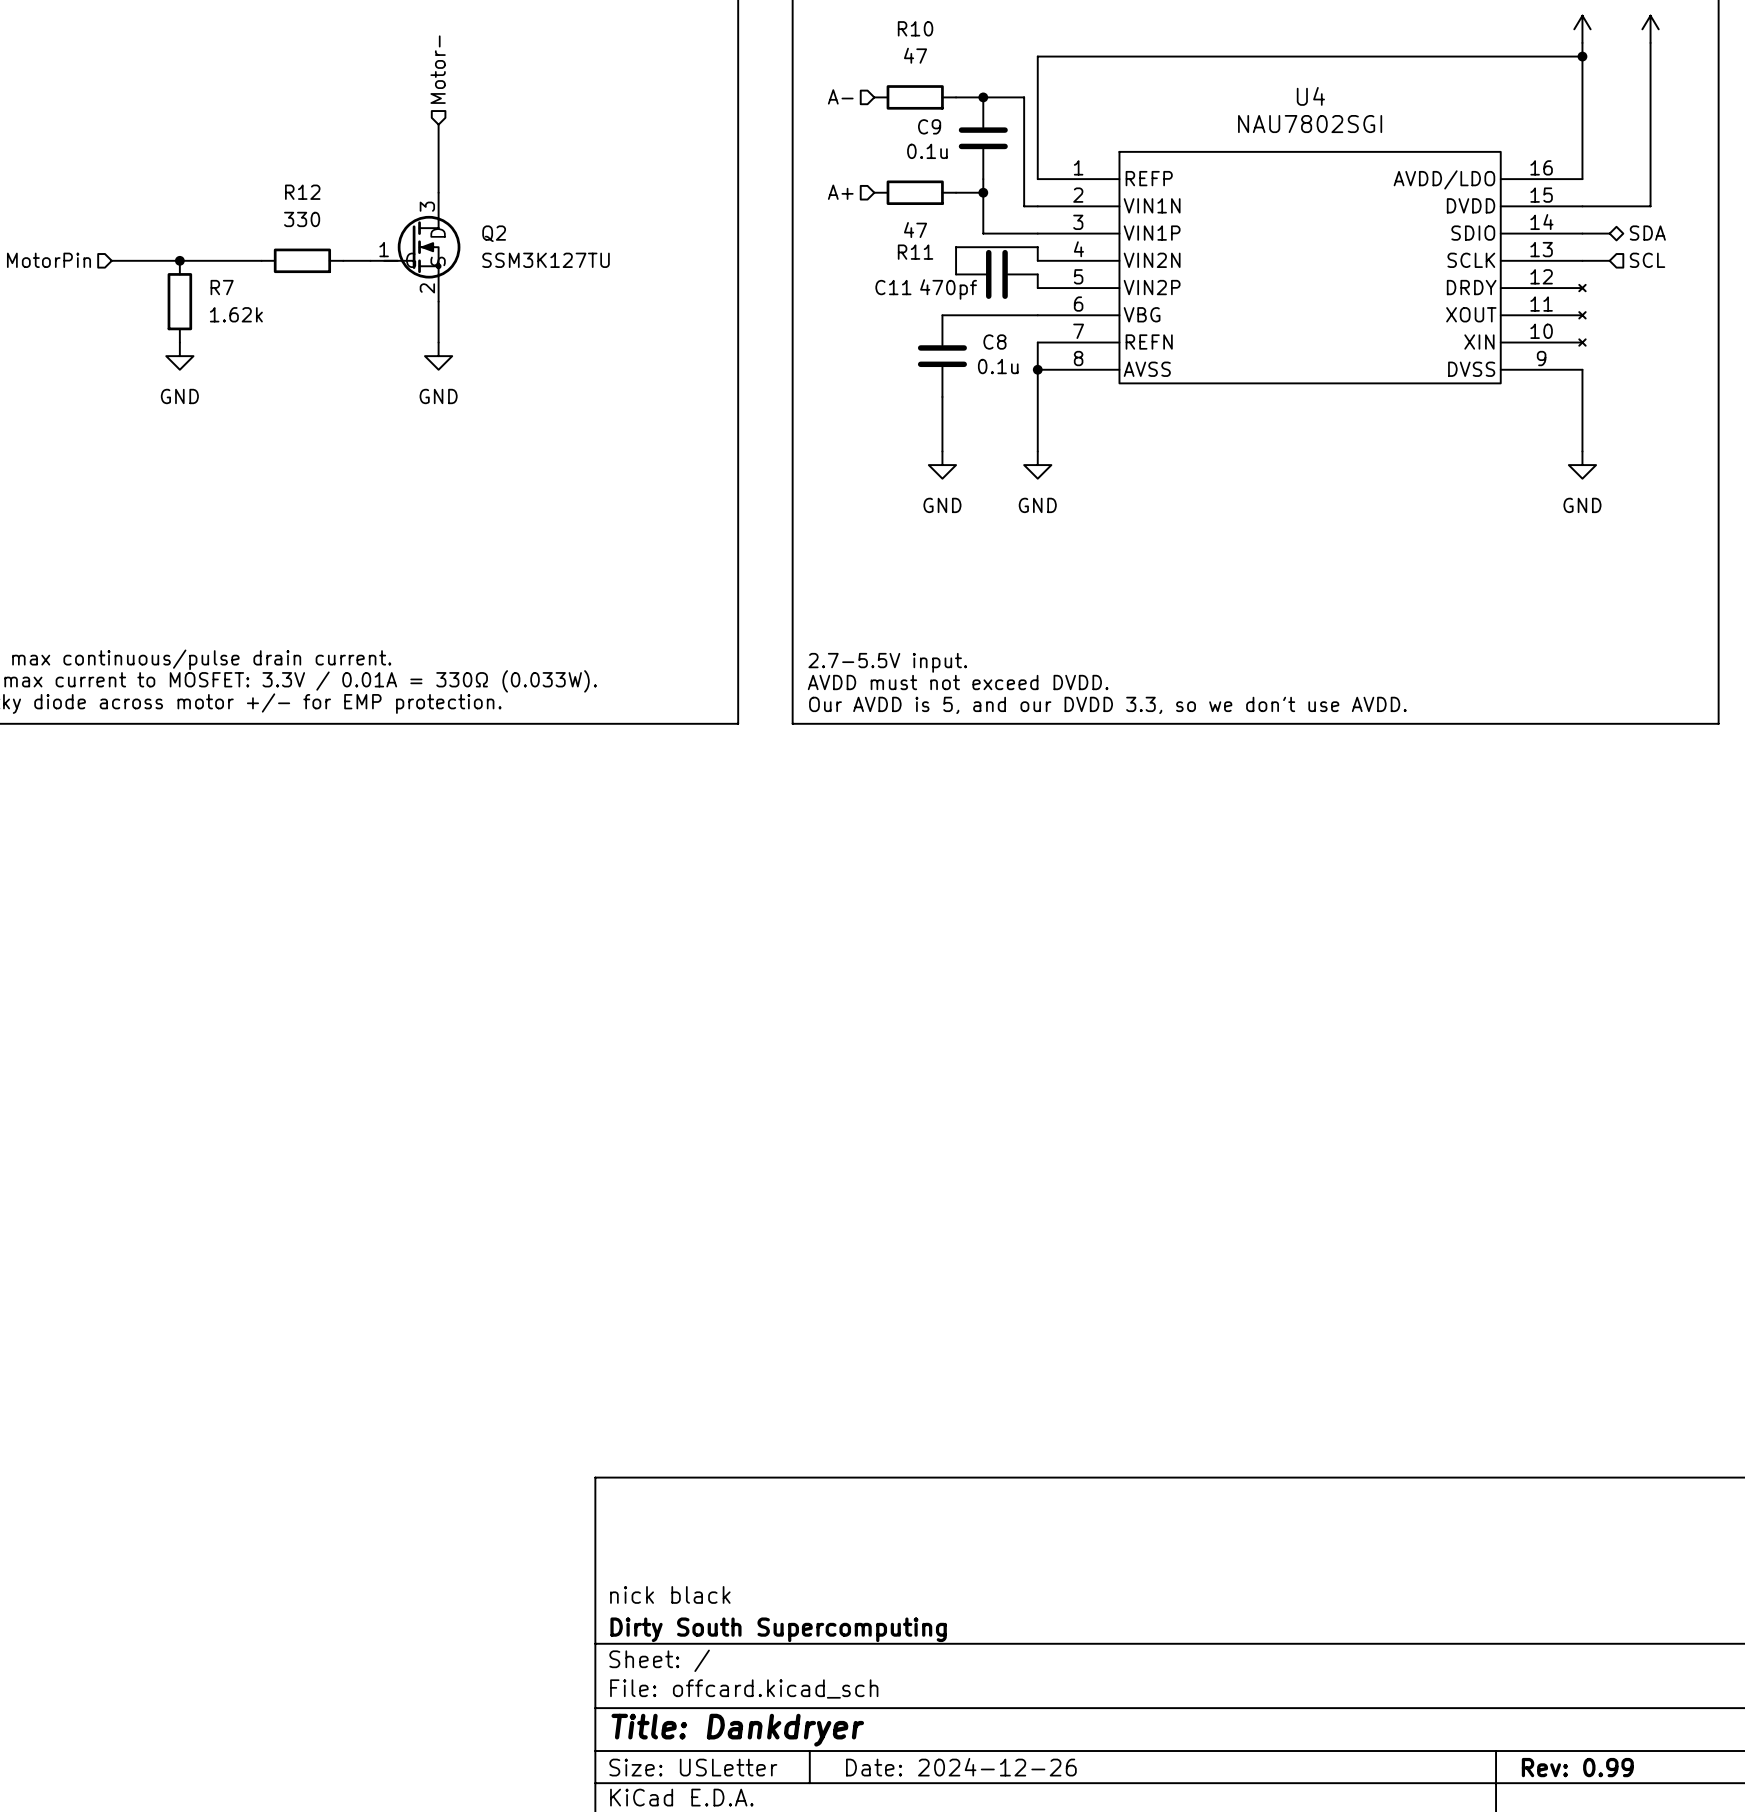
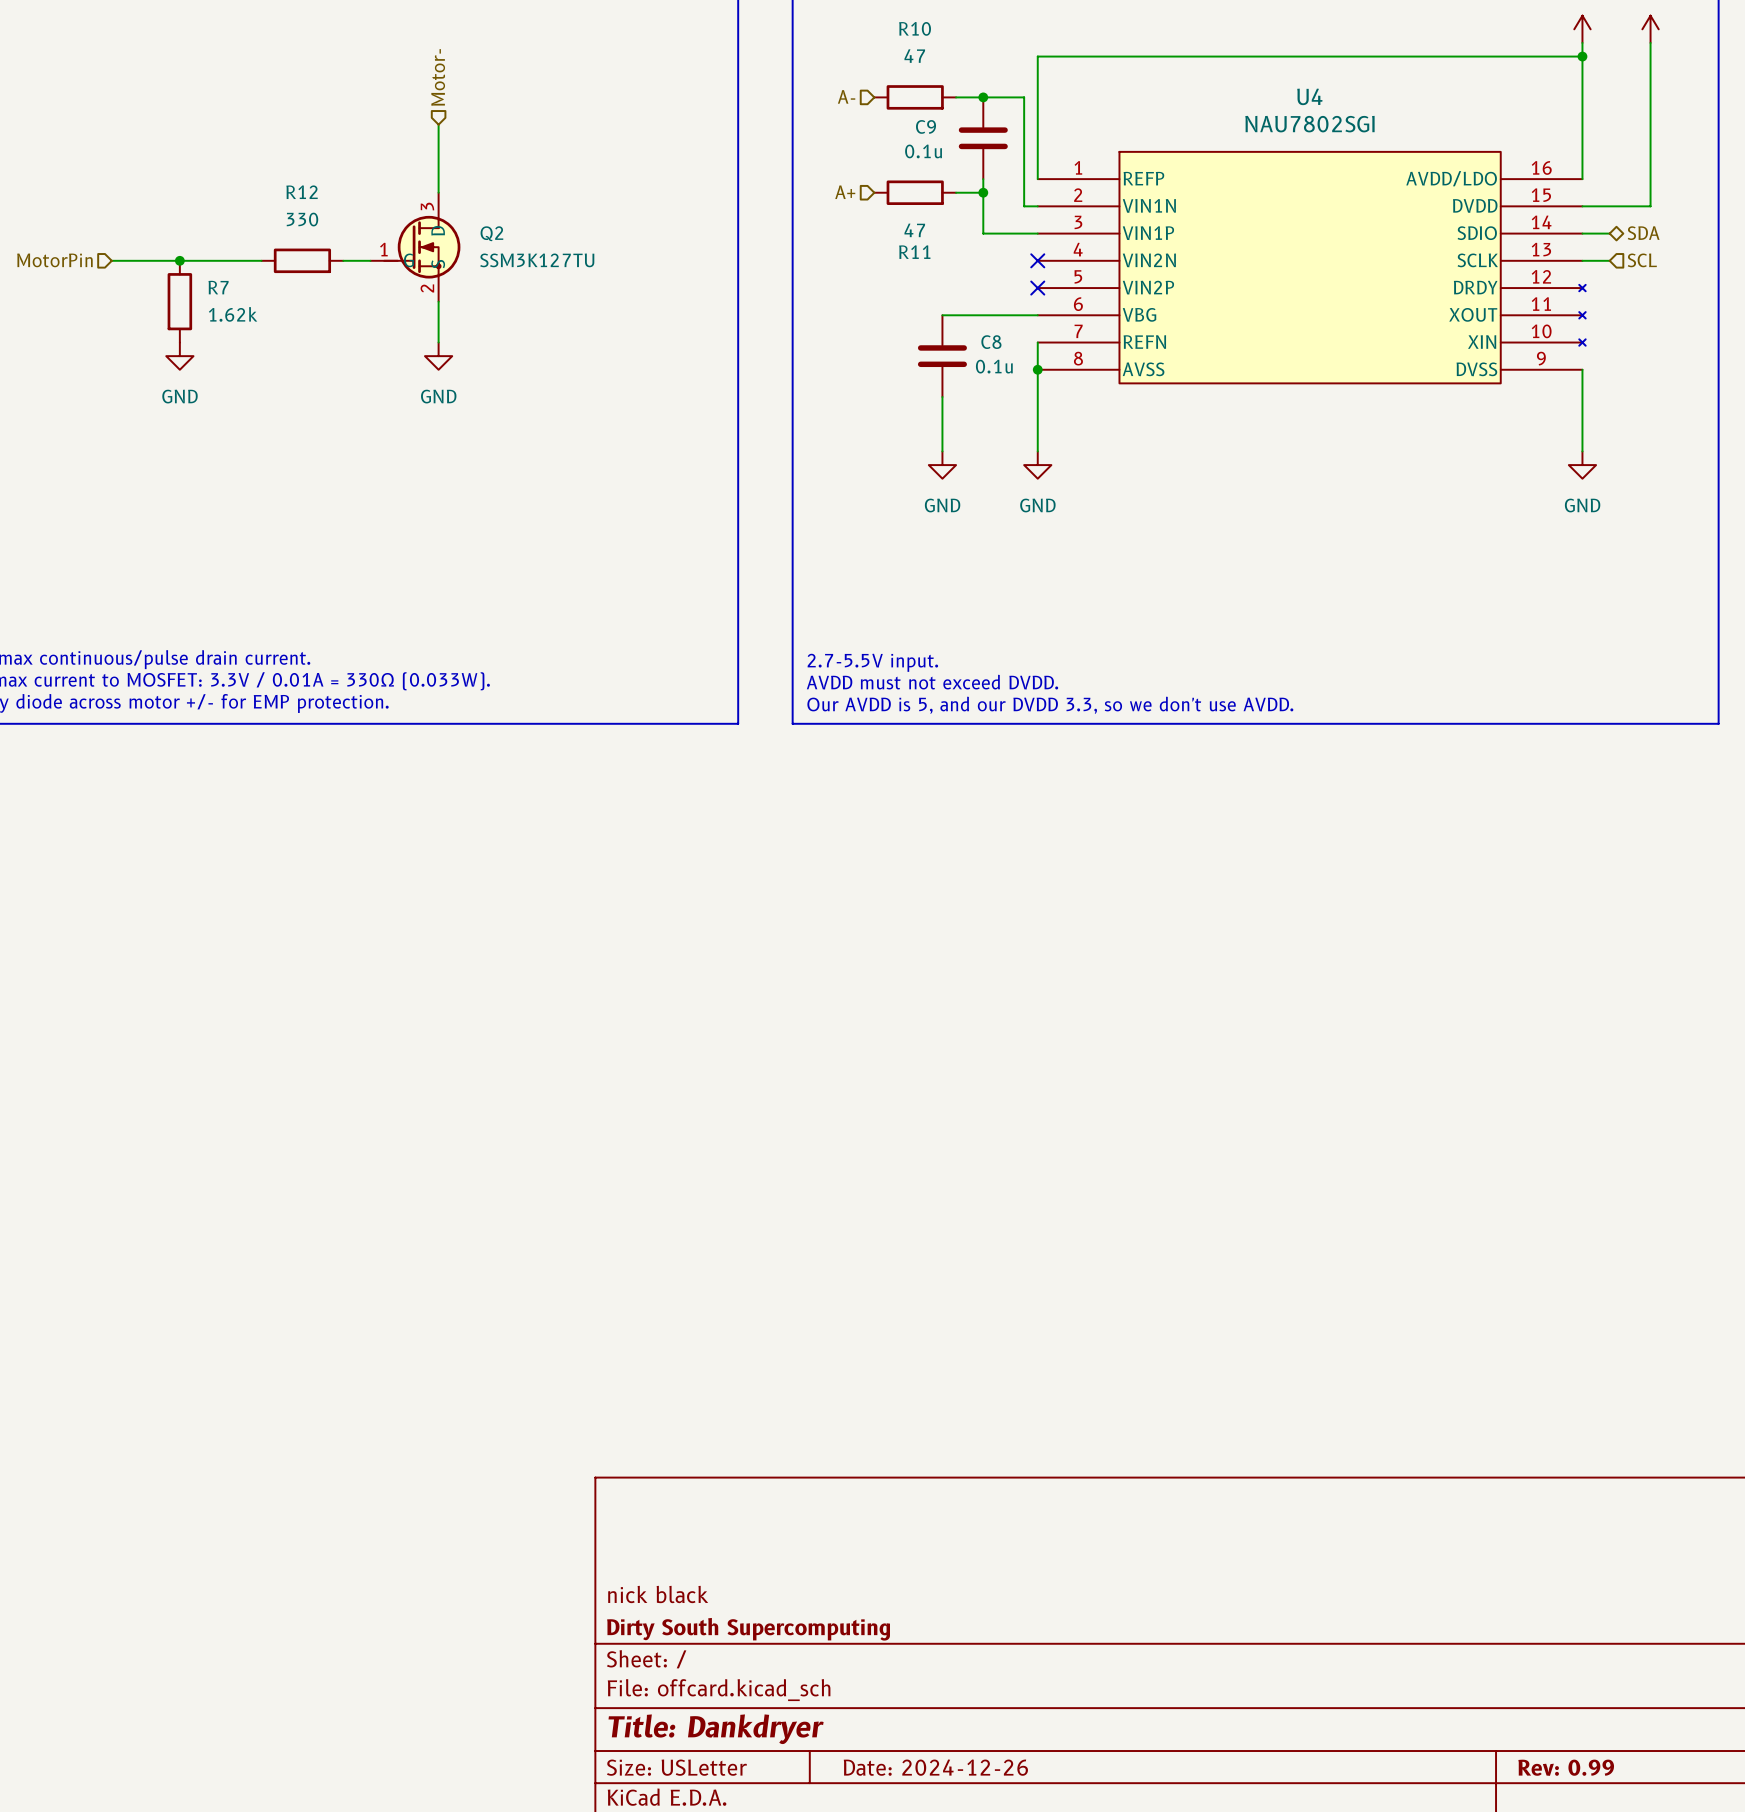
wire: (1037, 260) (1037, 247) (956, 247) (956, 274) -> none
no-connect mark: none -> (1037, 260)
C11: 470pf (996, 274) -> none
wire: (1037, 274) (1037, 288) -> none
no-connect mark: none -> (1037, 288)

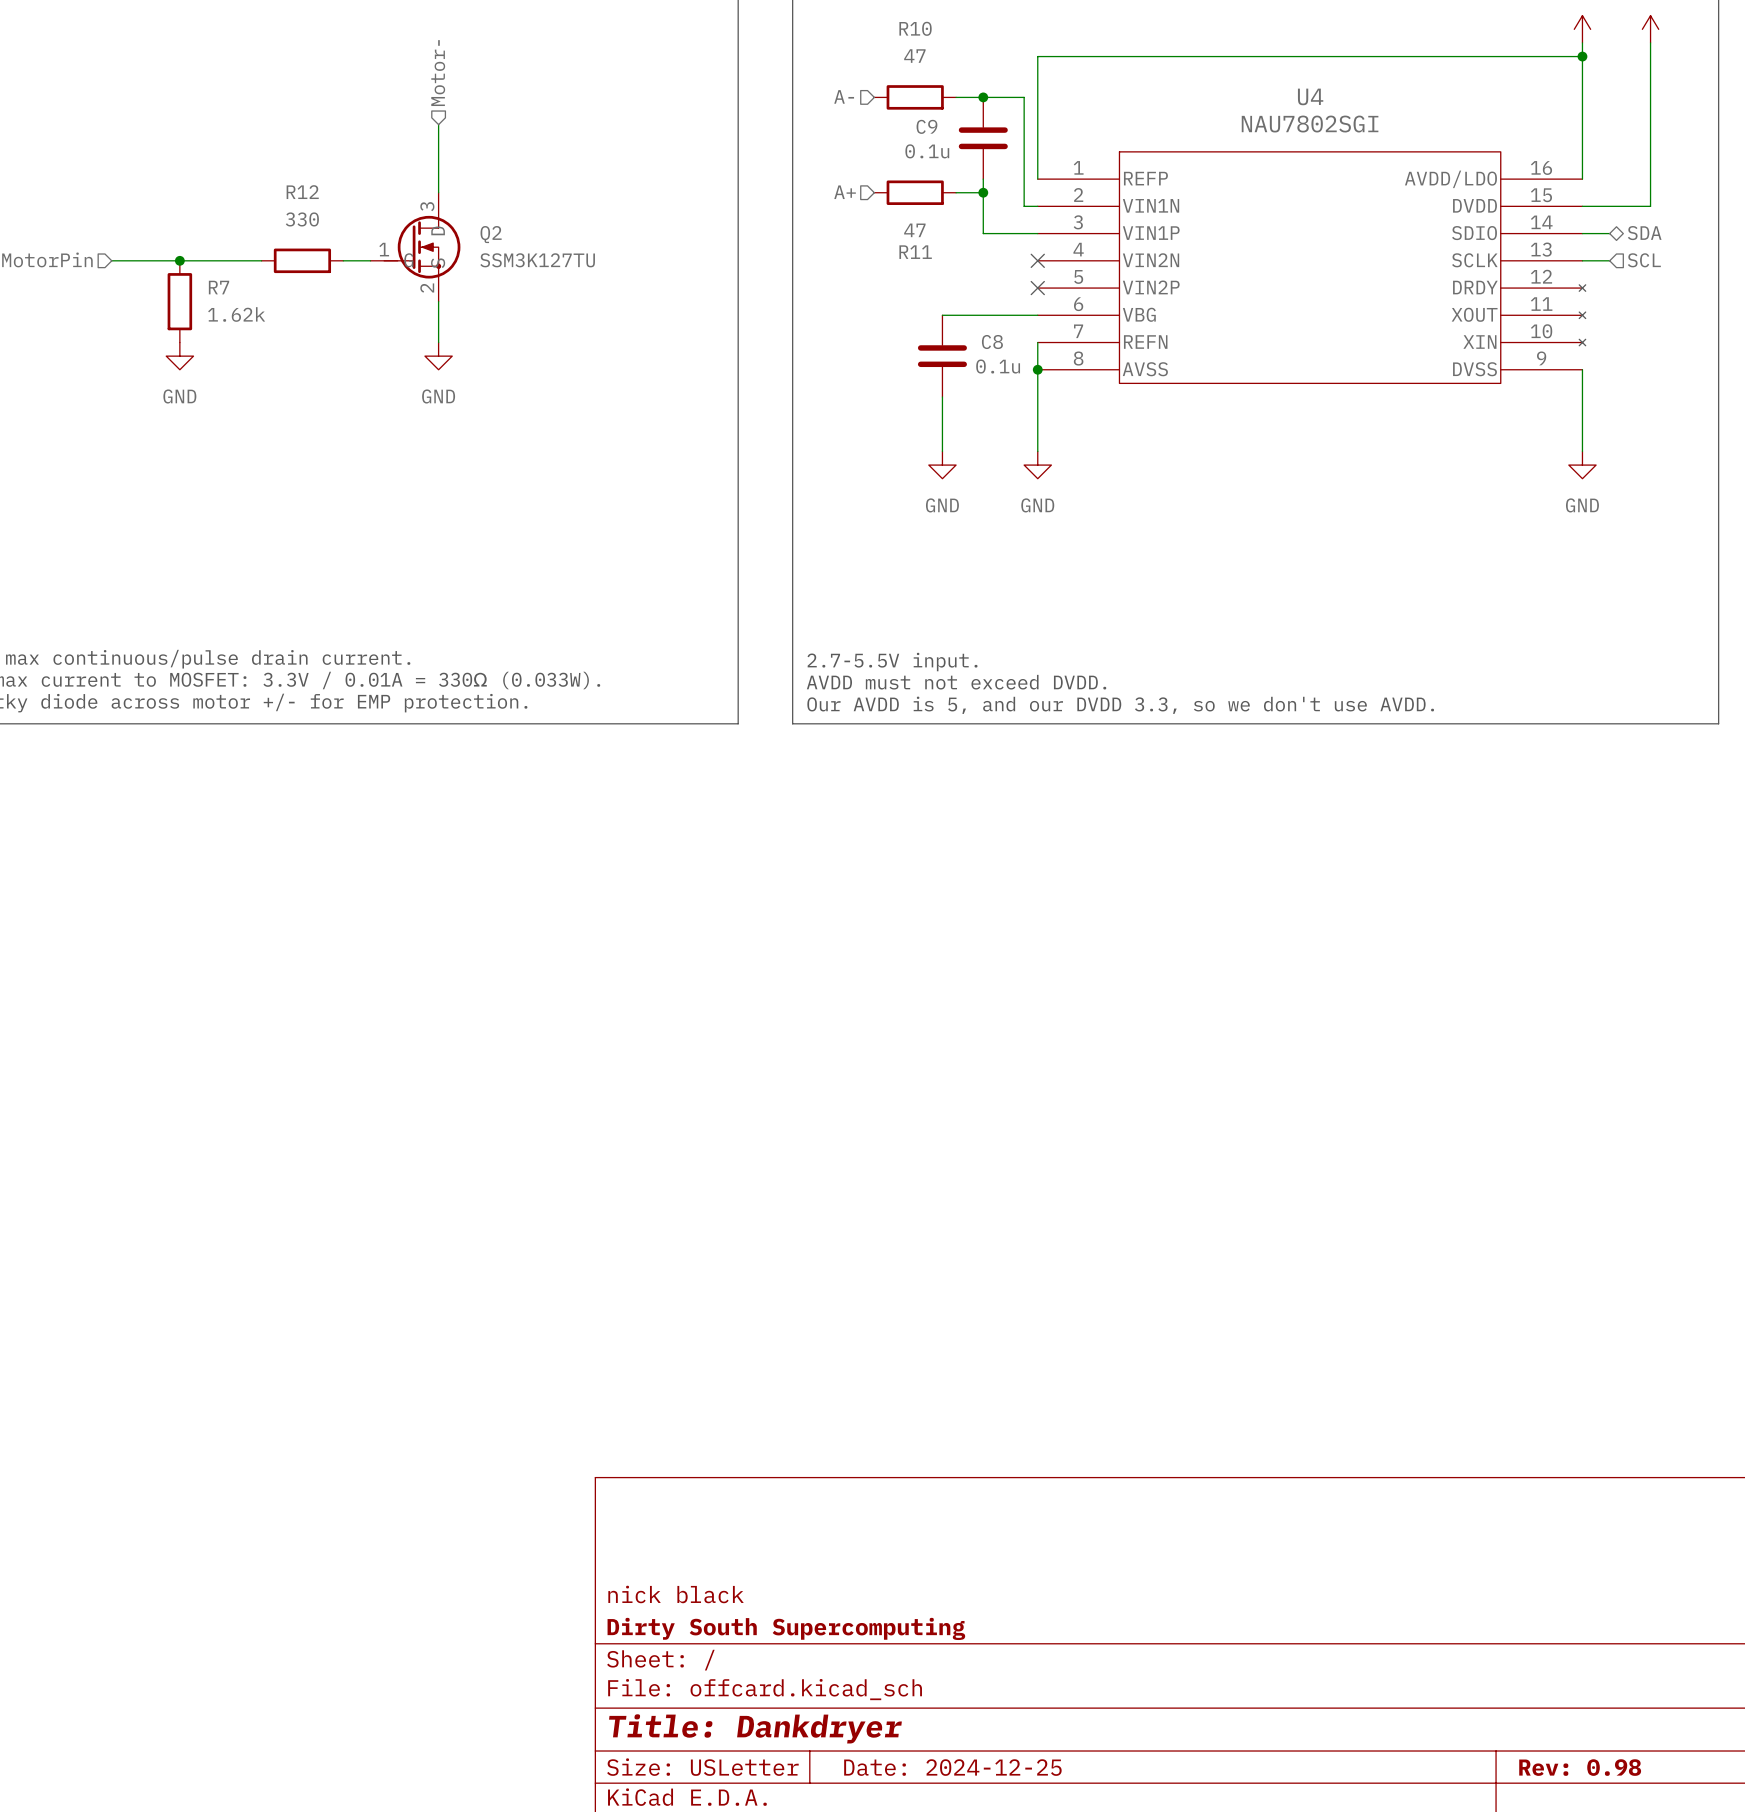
title block: Date: 2024-12-26 (935, 1767) -> Date: 2024-12-25 (952, 1767)
title block: Rev: 0.99 (1566, 1767) -> Rev: 0.98 (1580, 1767)

